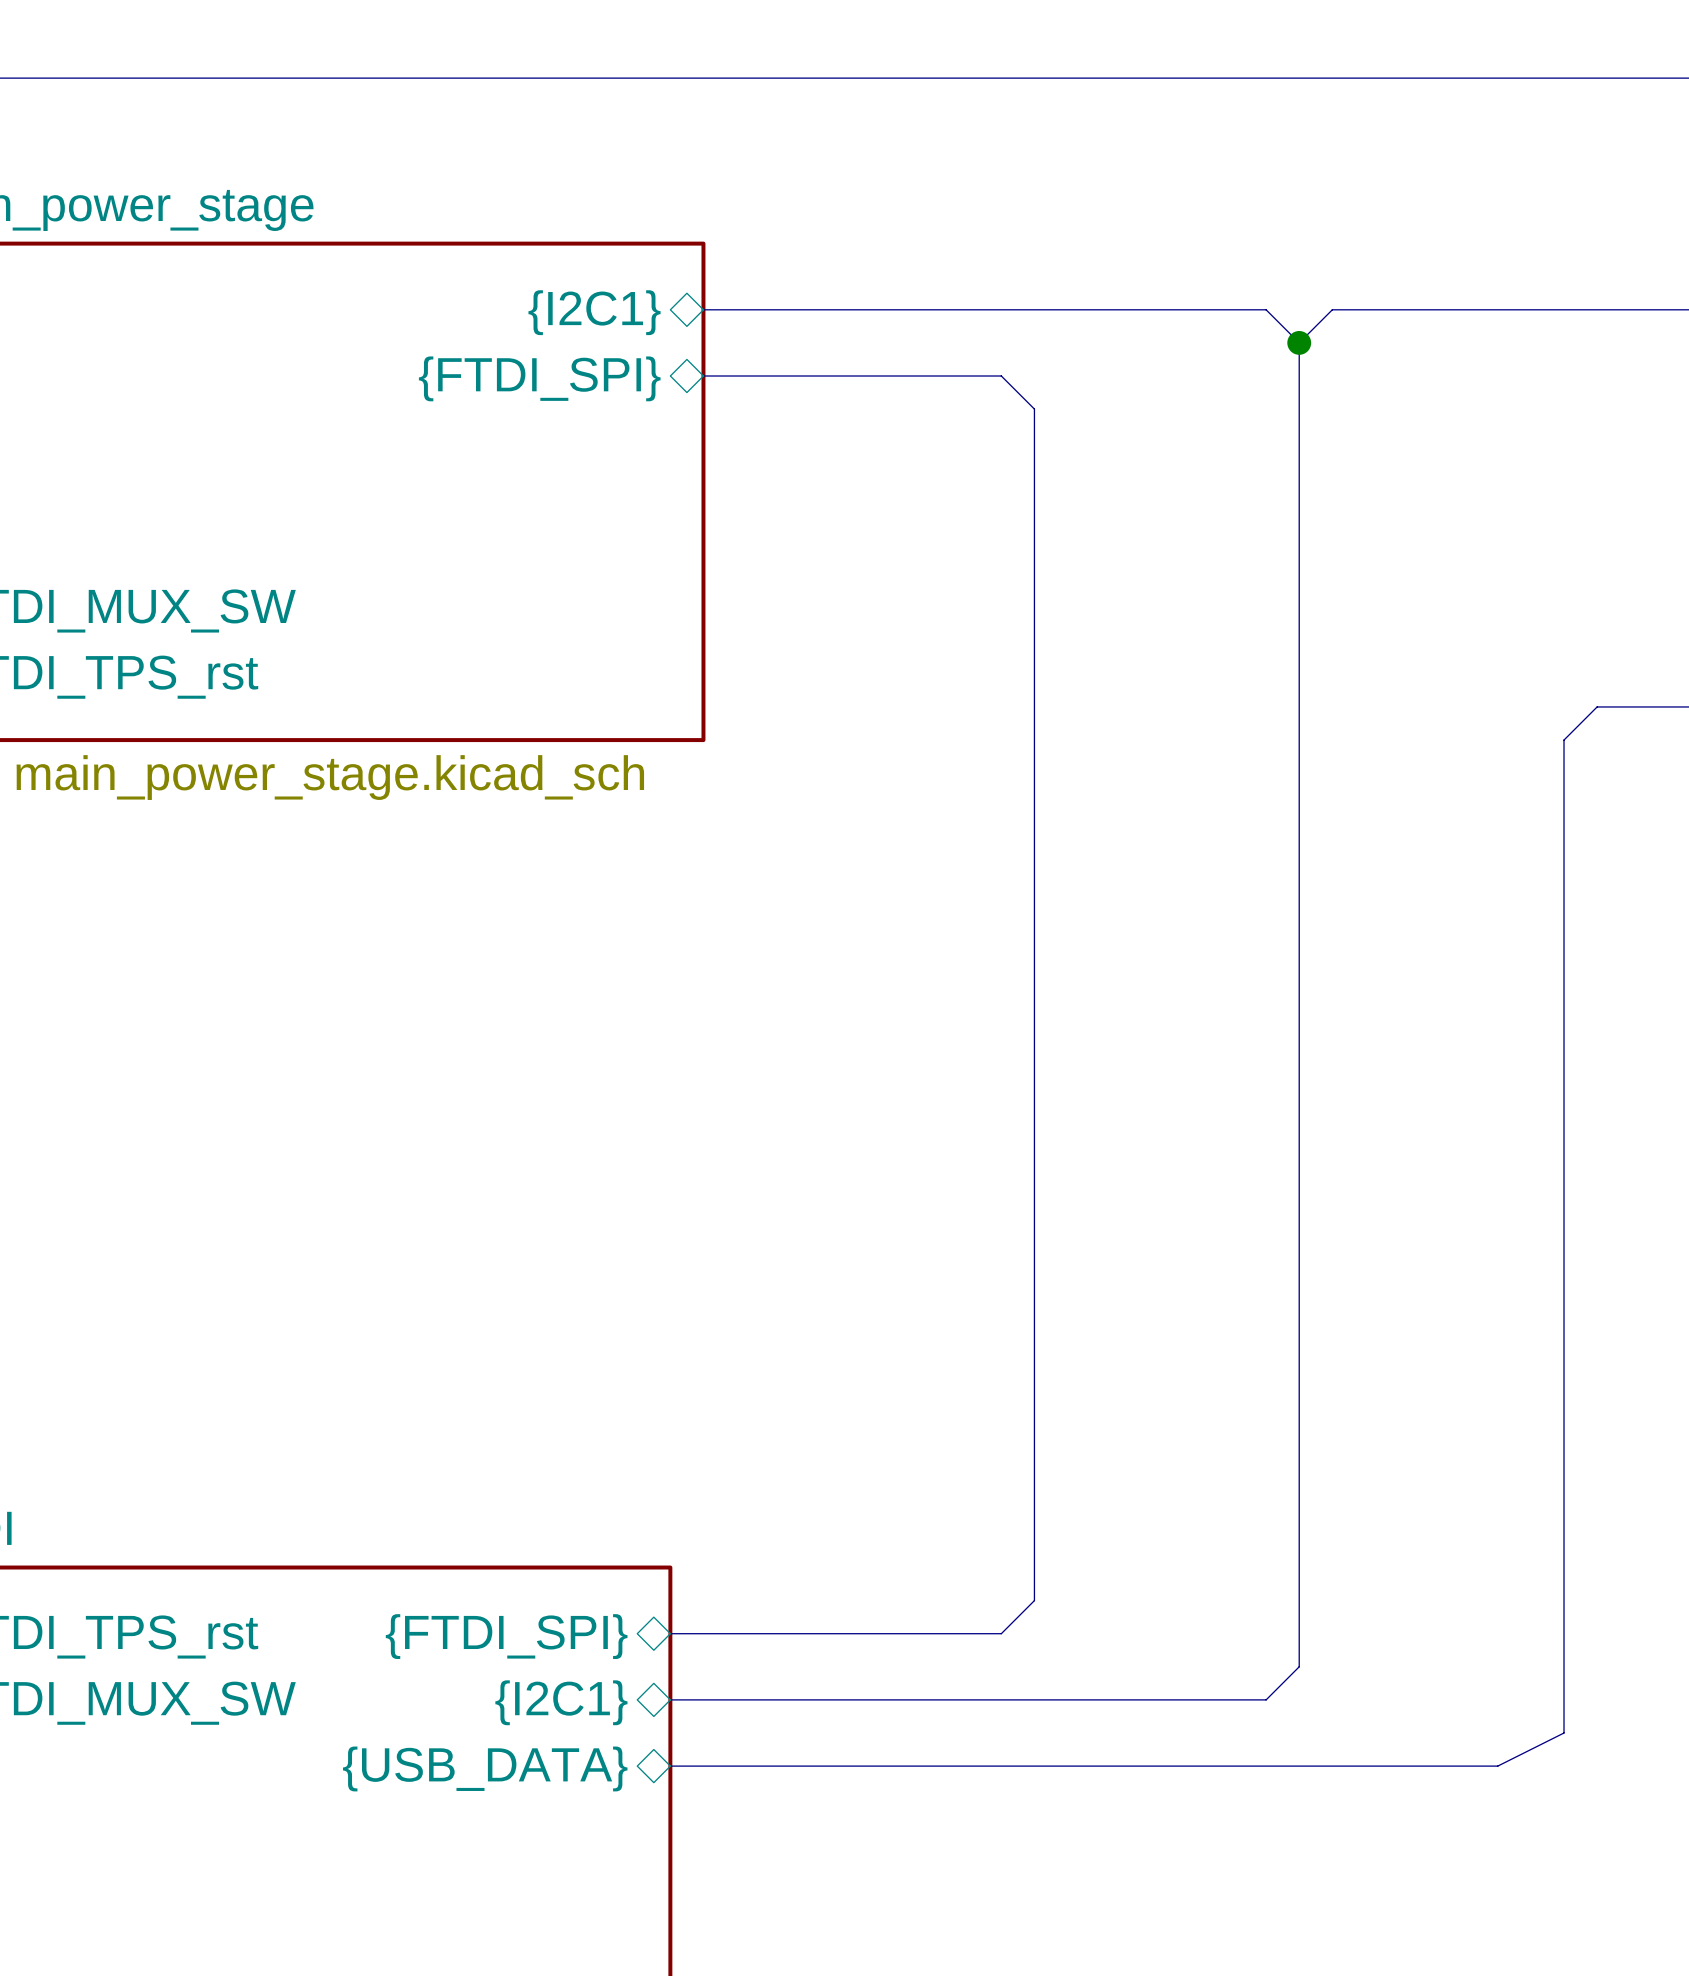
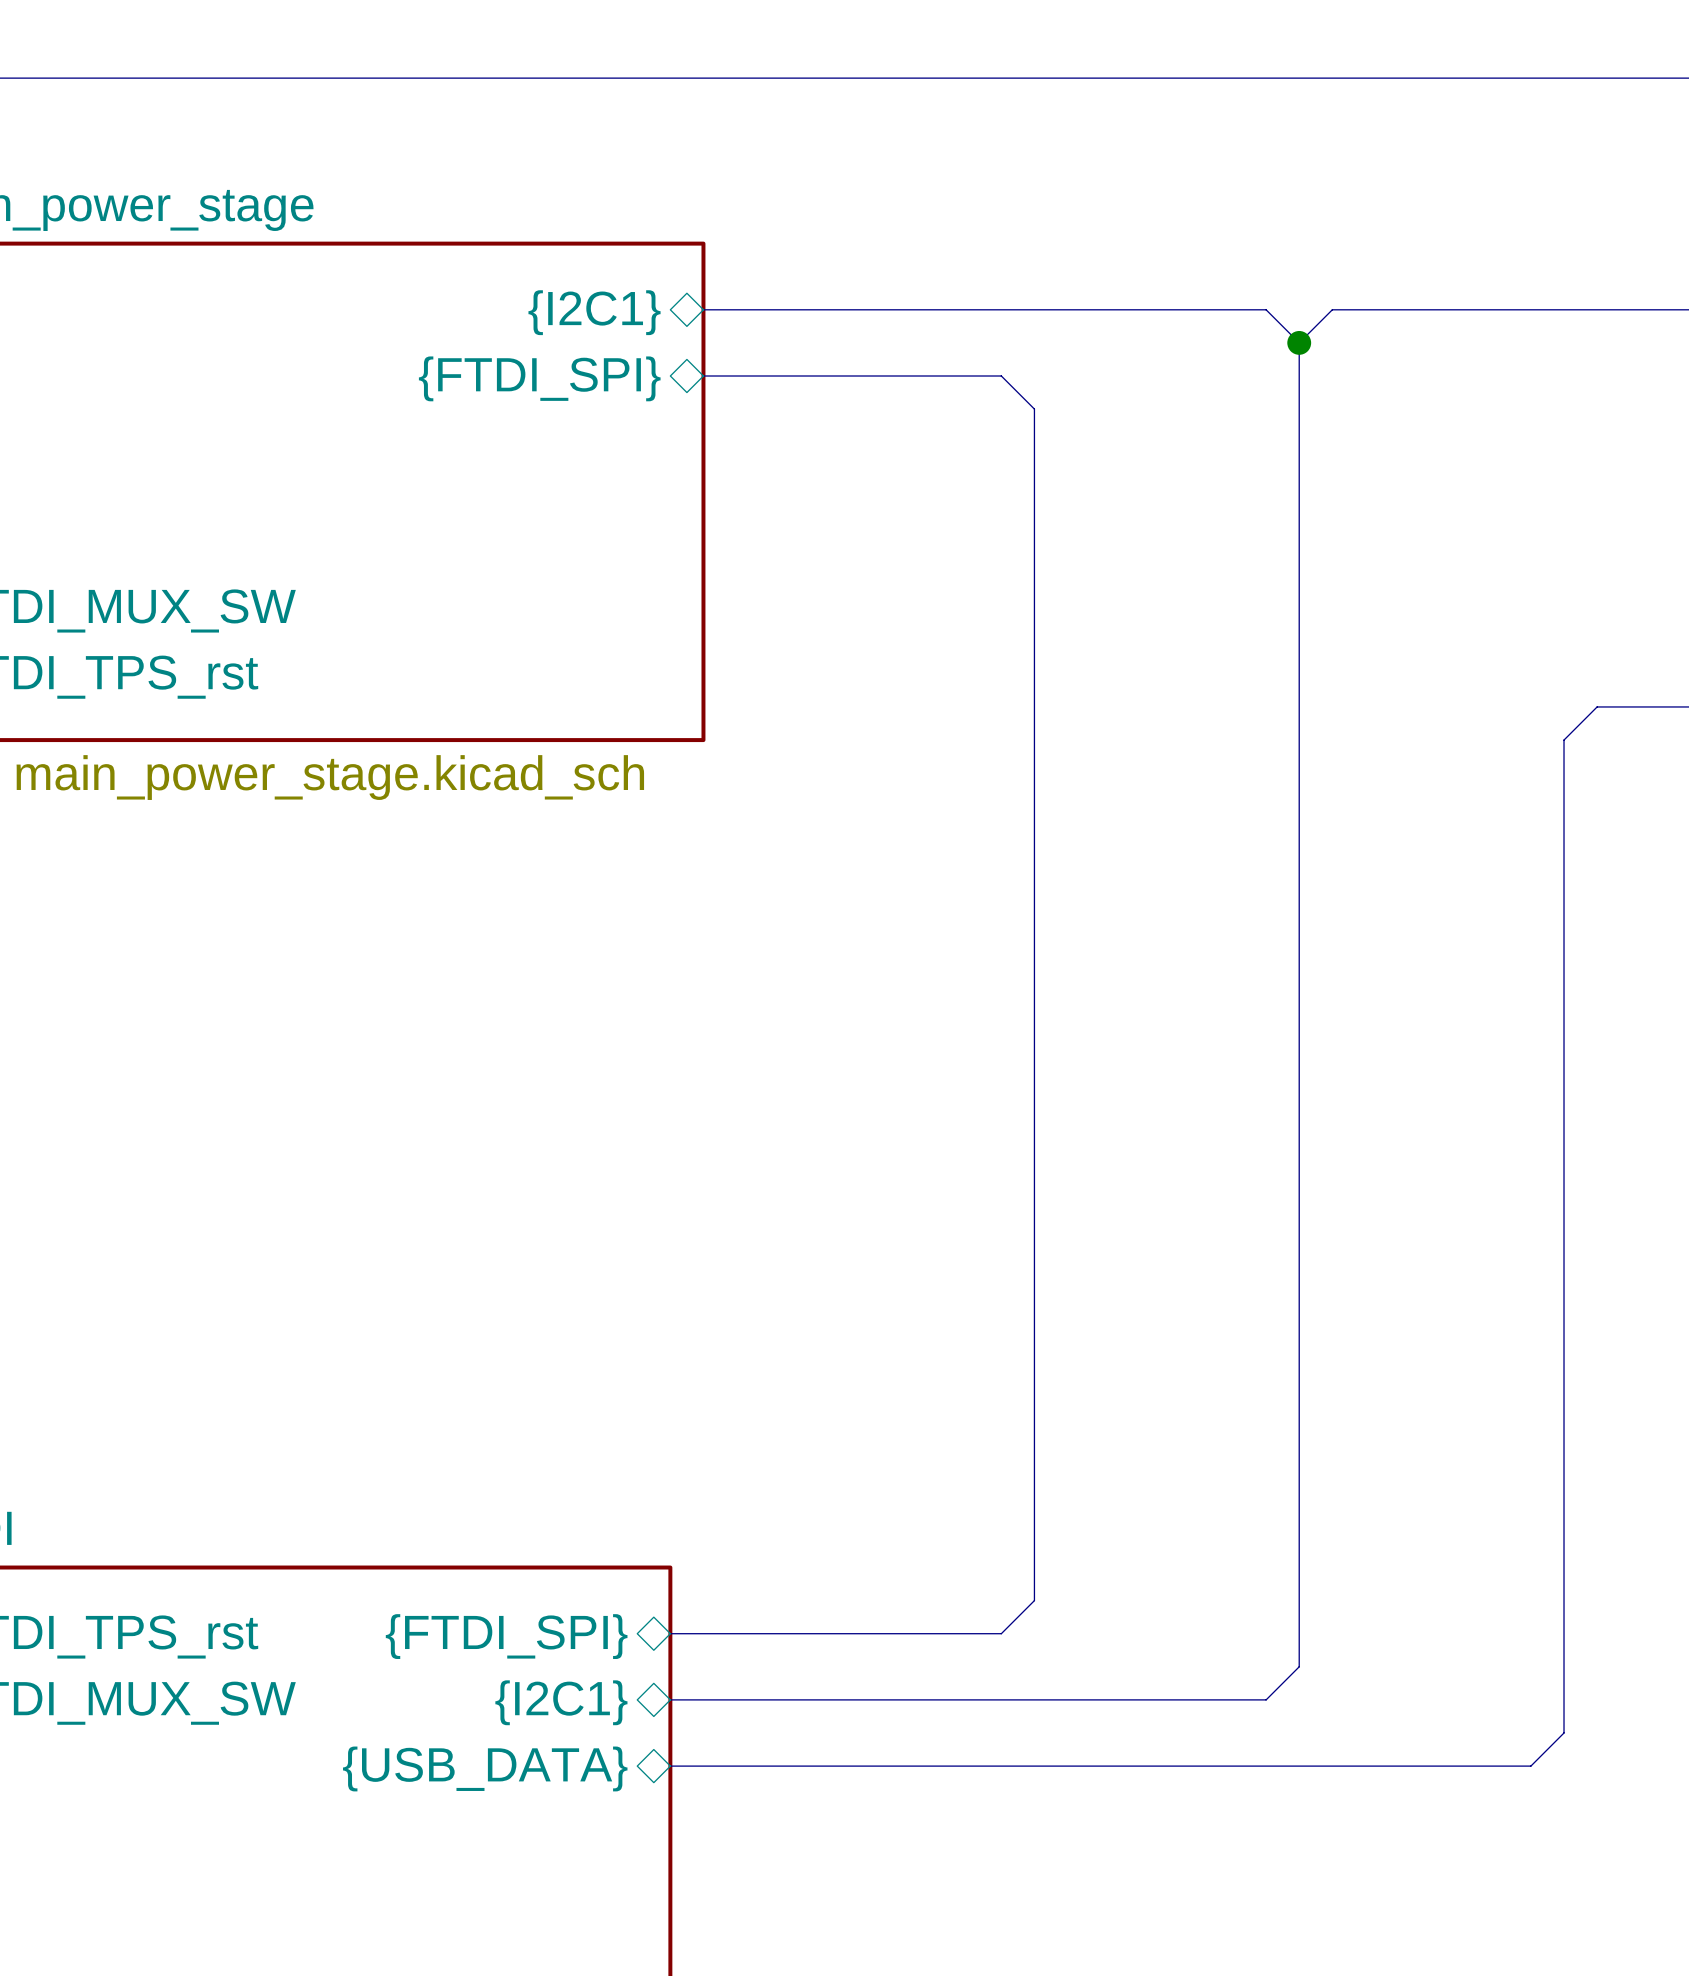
bus: (1564, 1733) (1497, 1766) -> (1564, 1733) (1530, 1766) (1497, 1766)

